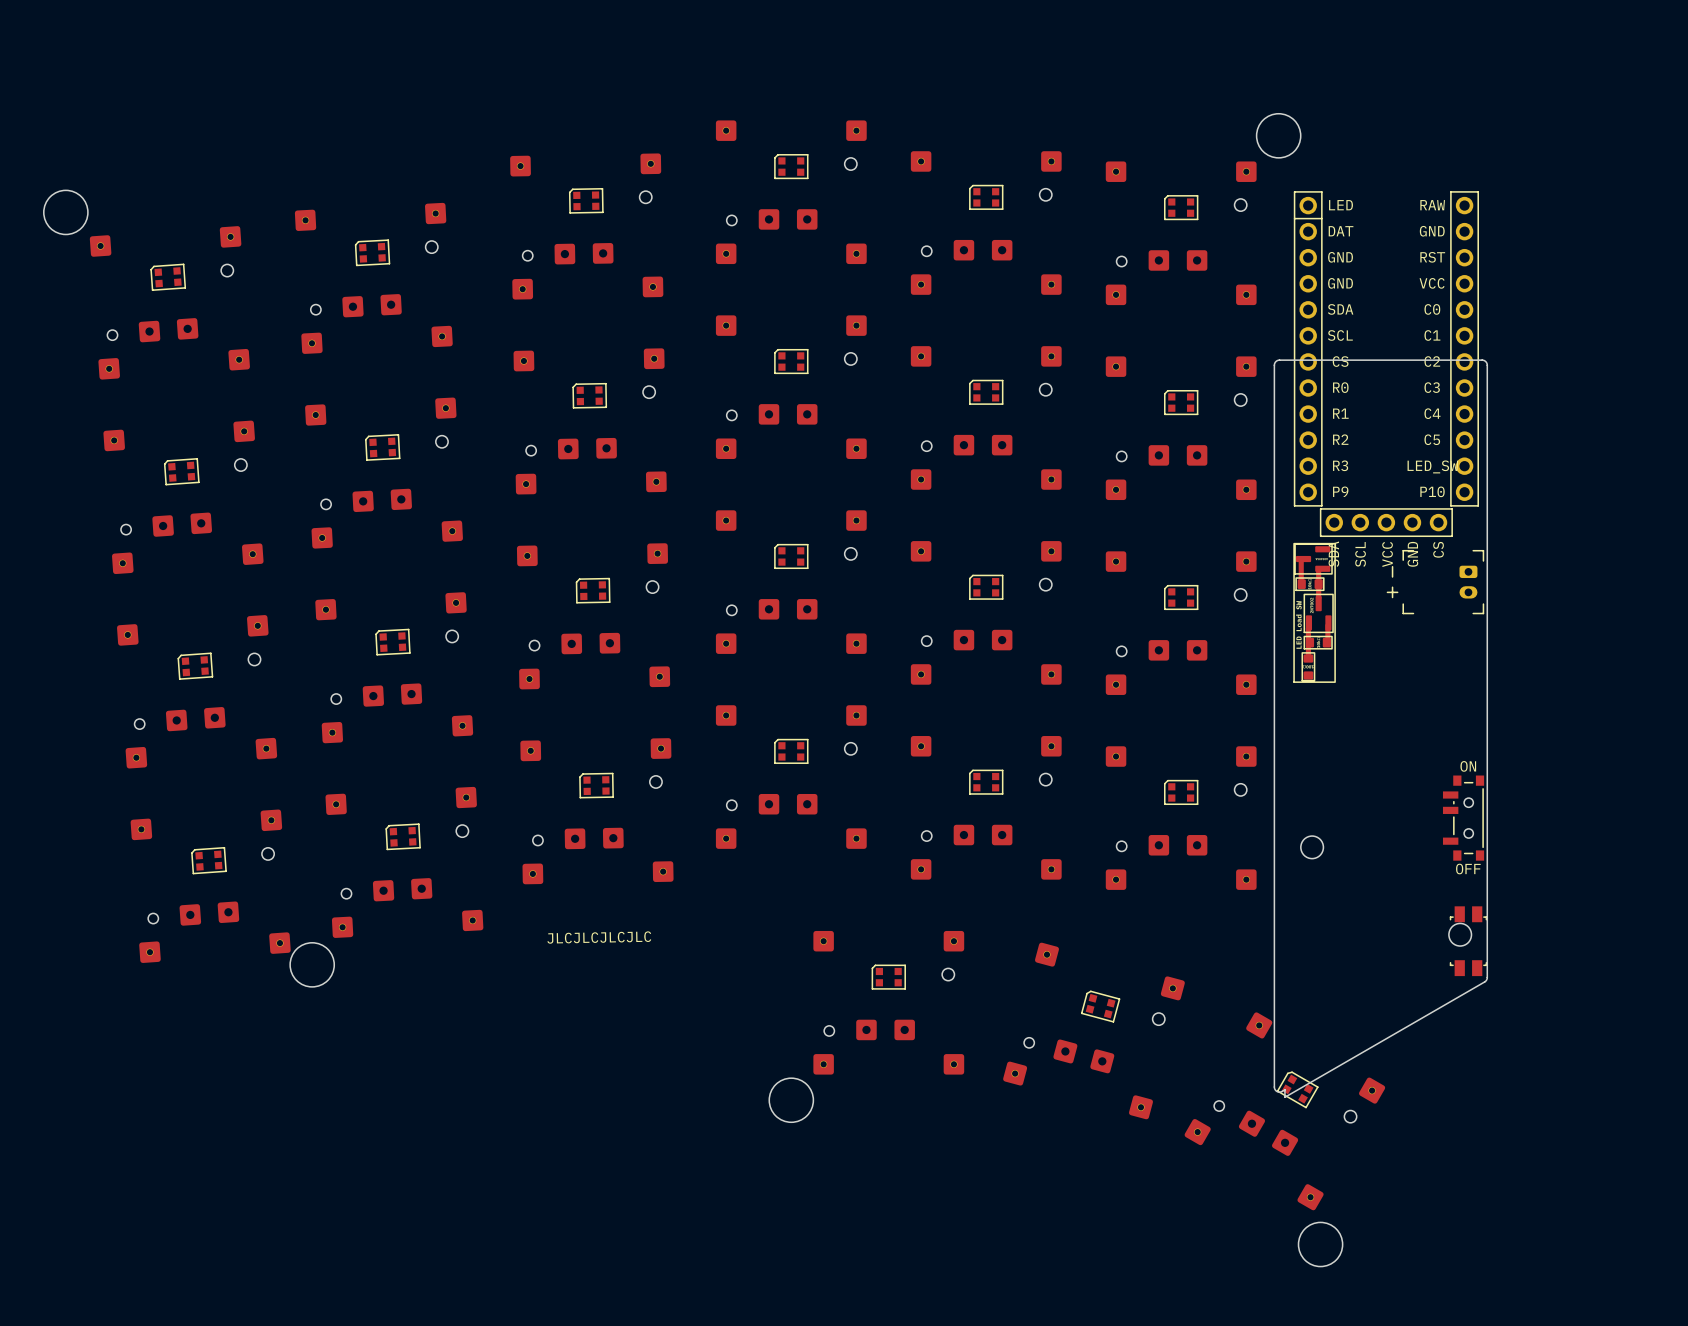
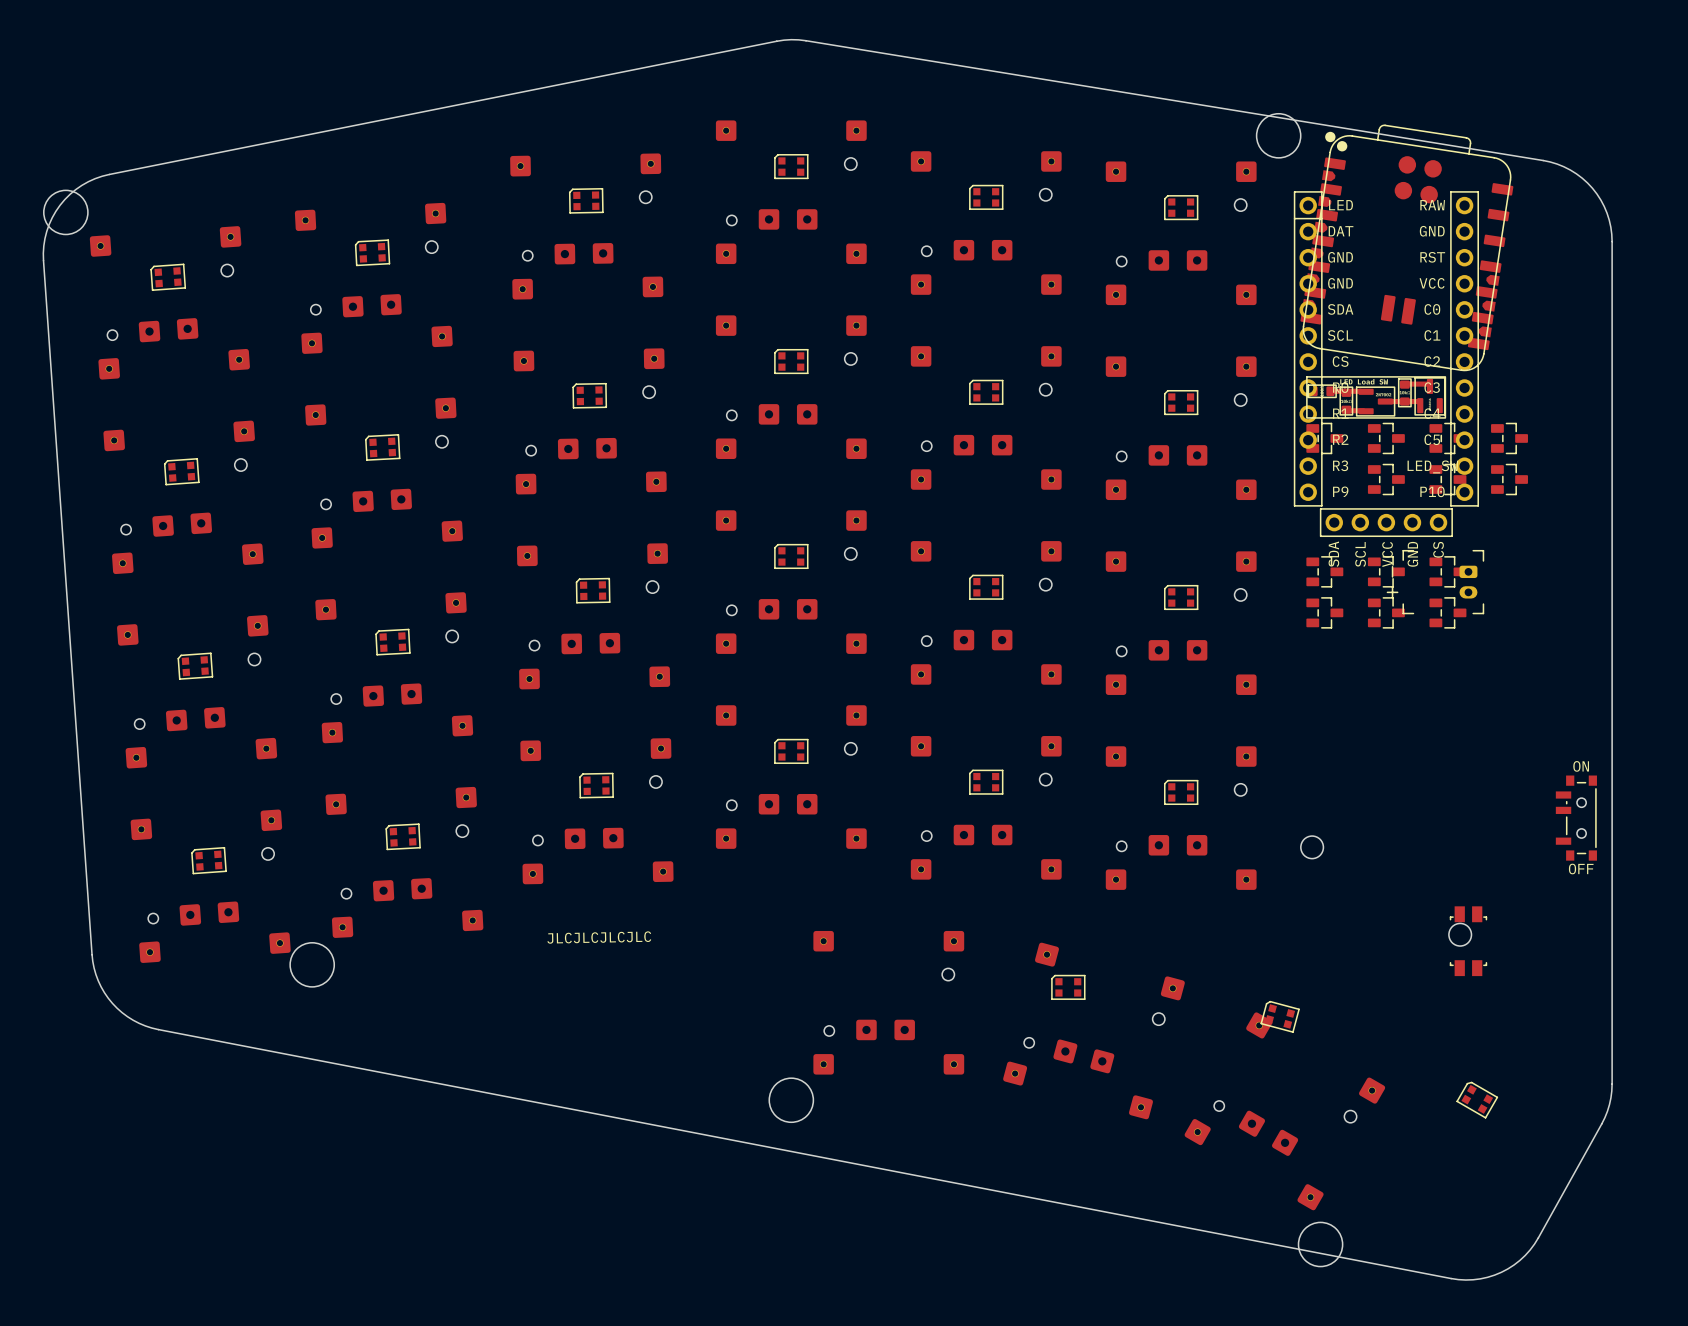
board edge: none -> (805, 40) (1543, 160) (1563, 166) (1576, 173) (1592, 188) (1600, 200) (1609, 220) (1612, 241) (1611, 1091) (1604, 1117) (1538, 1237) (1525, 1255) (1507, 1268) (1480, 1278) (1451, 1278) (158, 1029) (139, 1023) (122, 1012) (108, 998) (101, 986) (95, 974) (92, 954) (43, 260) (46, 231) (60, 205) (81, 185) (109, 174) (776, 41) (805, 40)
part: none -> (1406, 247)
board edge: (1279, 360) (1482, 360) (1485, 361) (1487, 365) (1487, 978) (1284, 1097) (1284, 1089) (1278, 1091) (1274, 1087) (1274, 365) (1275, 361) (1279, 360) -> none
part: none -> (1376, 397)
part: none -> (1324, 438)
part: none -> (1386, 438)
part: none -> (1447, 438)
part: none -> (1509, 438)
part: none -> (1386, 479)
part: none -> (1447, 479)
part: none -> (1509, 479)
part footprint: [1293, 543, 1336, 683] -> [1306, 597, 1344, 629]
part: none -> (1324, 571)
part: none -> (1386, 571)
part: none -> (1447, 571)
part: none -> (1386, 612)
part: none -> (1447, 612)
part position: (1463, 818) -> (1576, 818)
part position: (888, 977) -> (1068, 987)
part position: (1100, 1006) -> (1280, 1016)
part position: (1297, 1089) -> (1477, 1100)

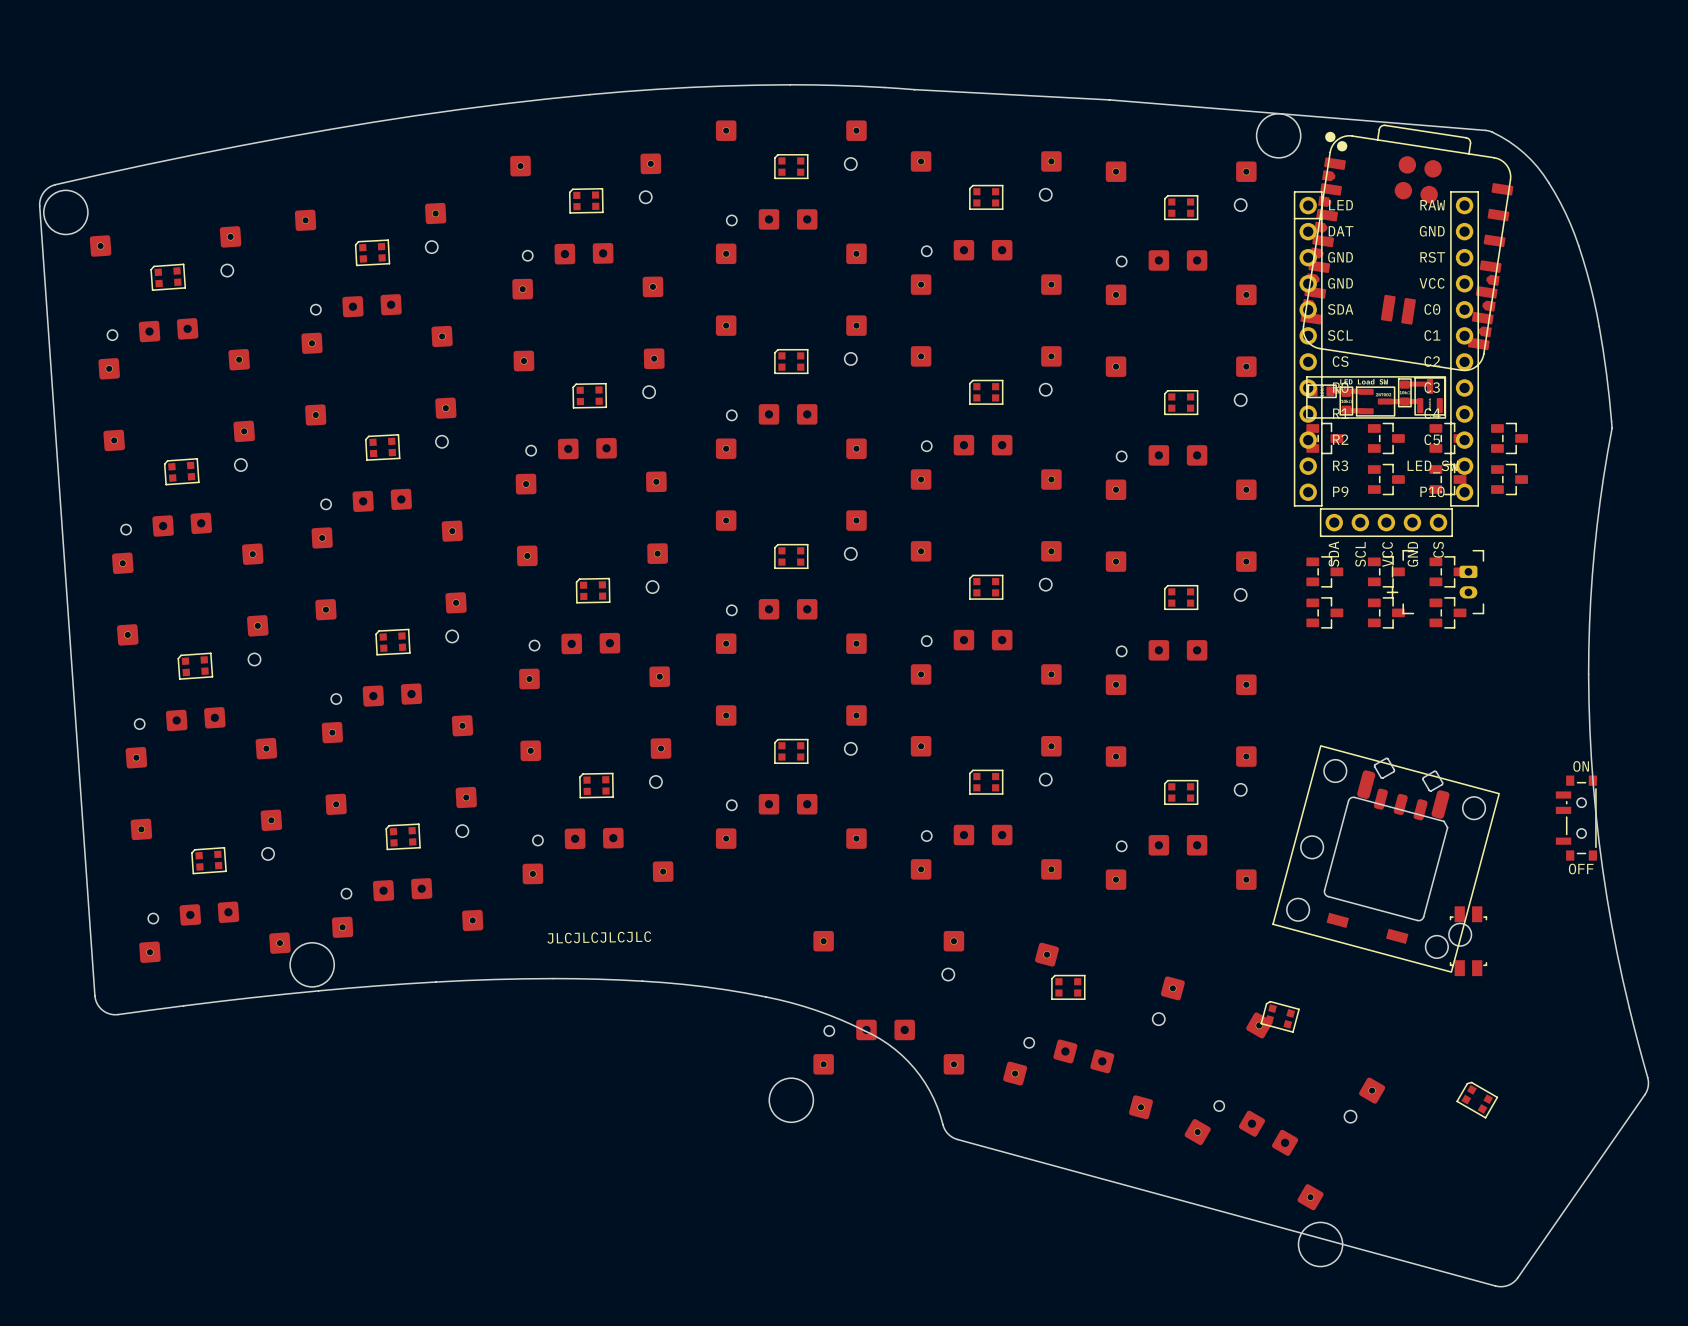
board edge: (43, 260) (46, 231) (60, 205) (75, 189) (102, 176) (791, 39) (1550, 161) (1570, 170) (1592, 188) (1604, 206) (1611, 234) (1611, 1091) (1604, 1117) (1538, 1237) (1519, 1260) (1501, 1272) (1480, 1278) (1451, 1278) (158, 1029) (133, 1020) (112, 1003) (98, 980) (92, 954) -> (43, 260) (39, 201) (45, 190) (53, 185) (192, 155) (329, 129) (459, 109) (589, 94) (723, 86) (861, 86) (1109, 99) (1492, 132) (1516, 147) (1531, 159) (1543, 174) (1560, 202) (1574, 234) (1586, 272) (1603, 350) (1612, 428) (1600, 501) (1590, 599) (1588, 674) (1591, 758) (1599, 842) (1611, 925) (1623, 980) (1648, 1084) (1644, 1094) (1517, 1277) (1507, 1285) (1497, 1286) (955, 1138) (944, 1128) (937, 1107) (925, 1083) (908, 1061) (895, 1049) (872, 1034) (840, 1019) (778, 999) (724, 989) (663, 982) (575, 978) (494, 979) (318, 990) (113, 1014) (102, 1010) (95, 1000) (92, 954)
part: none -> (1386, 858)

